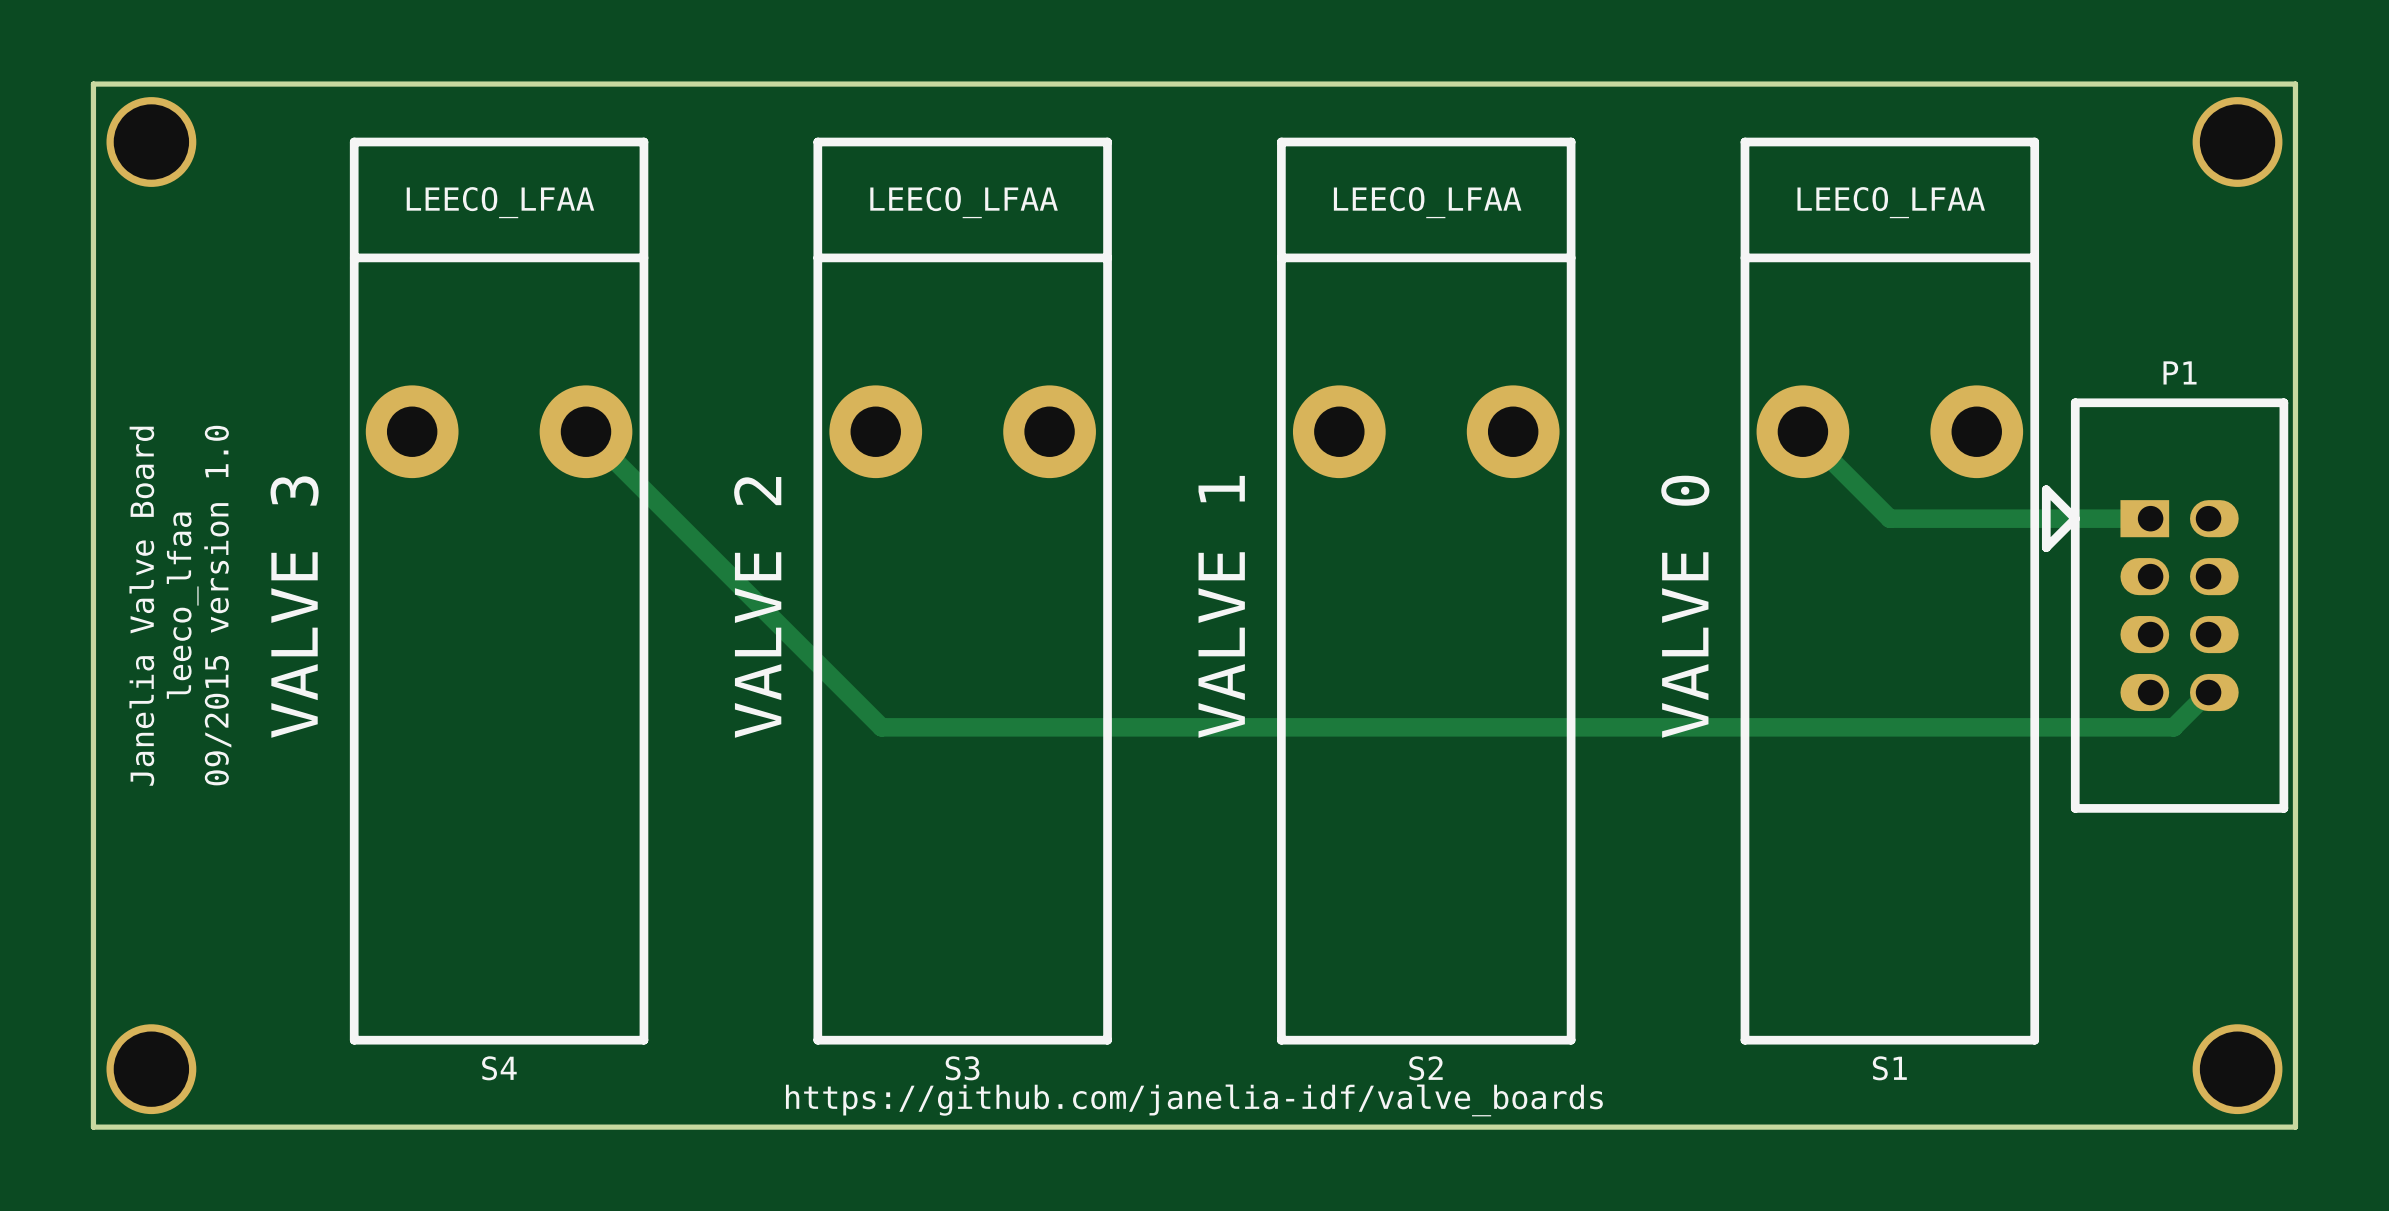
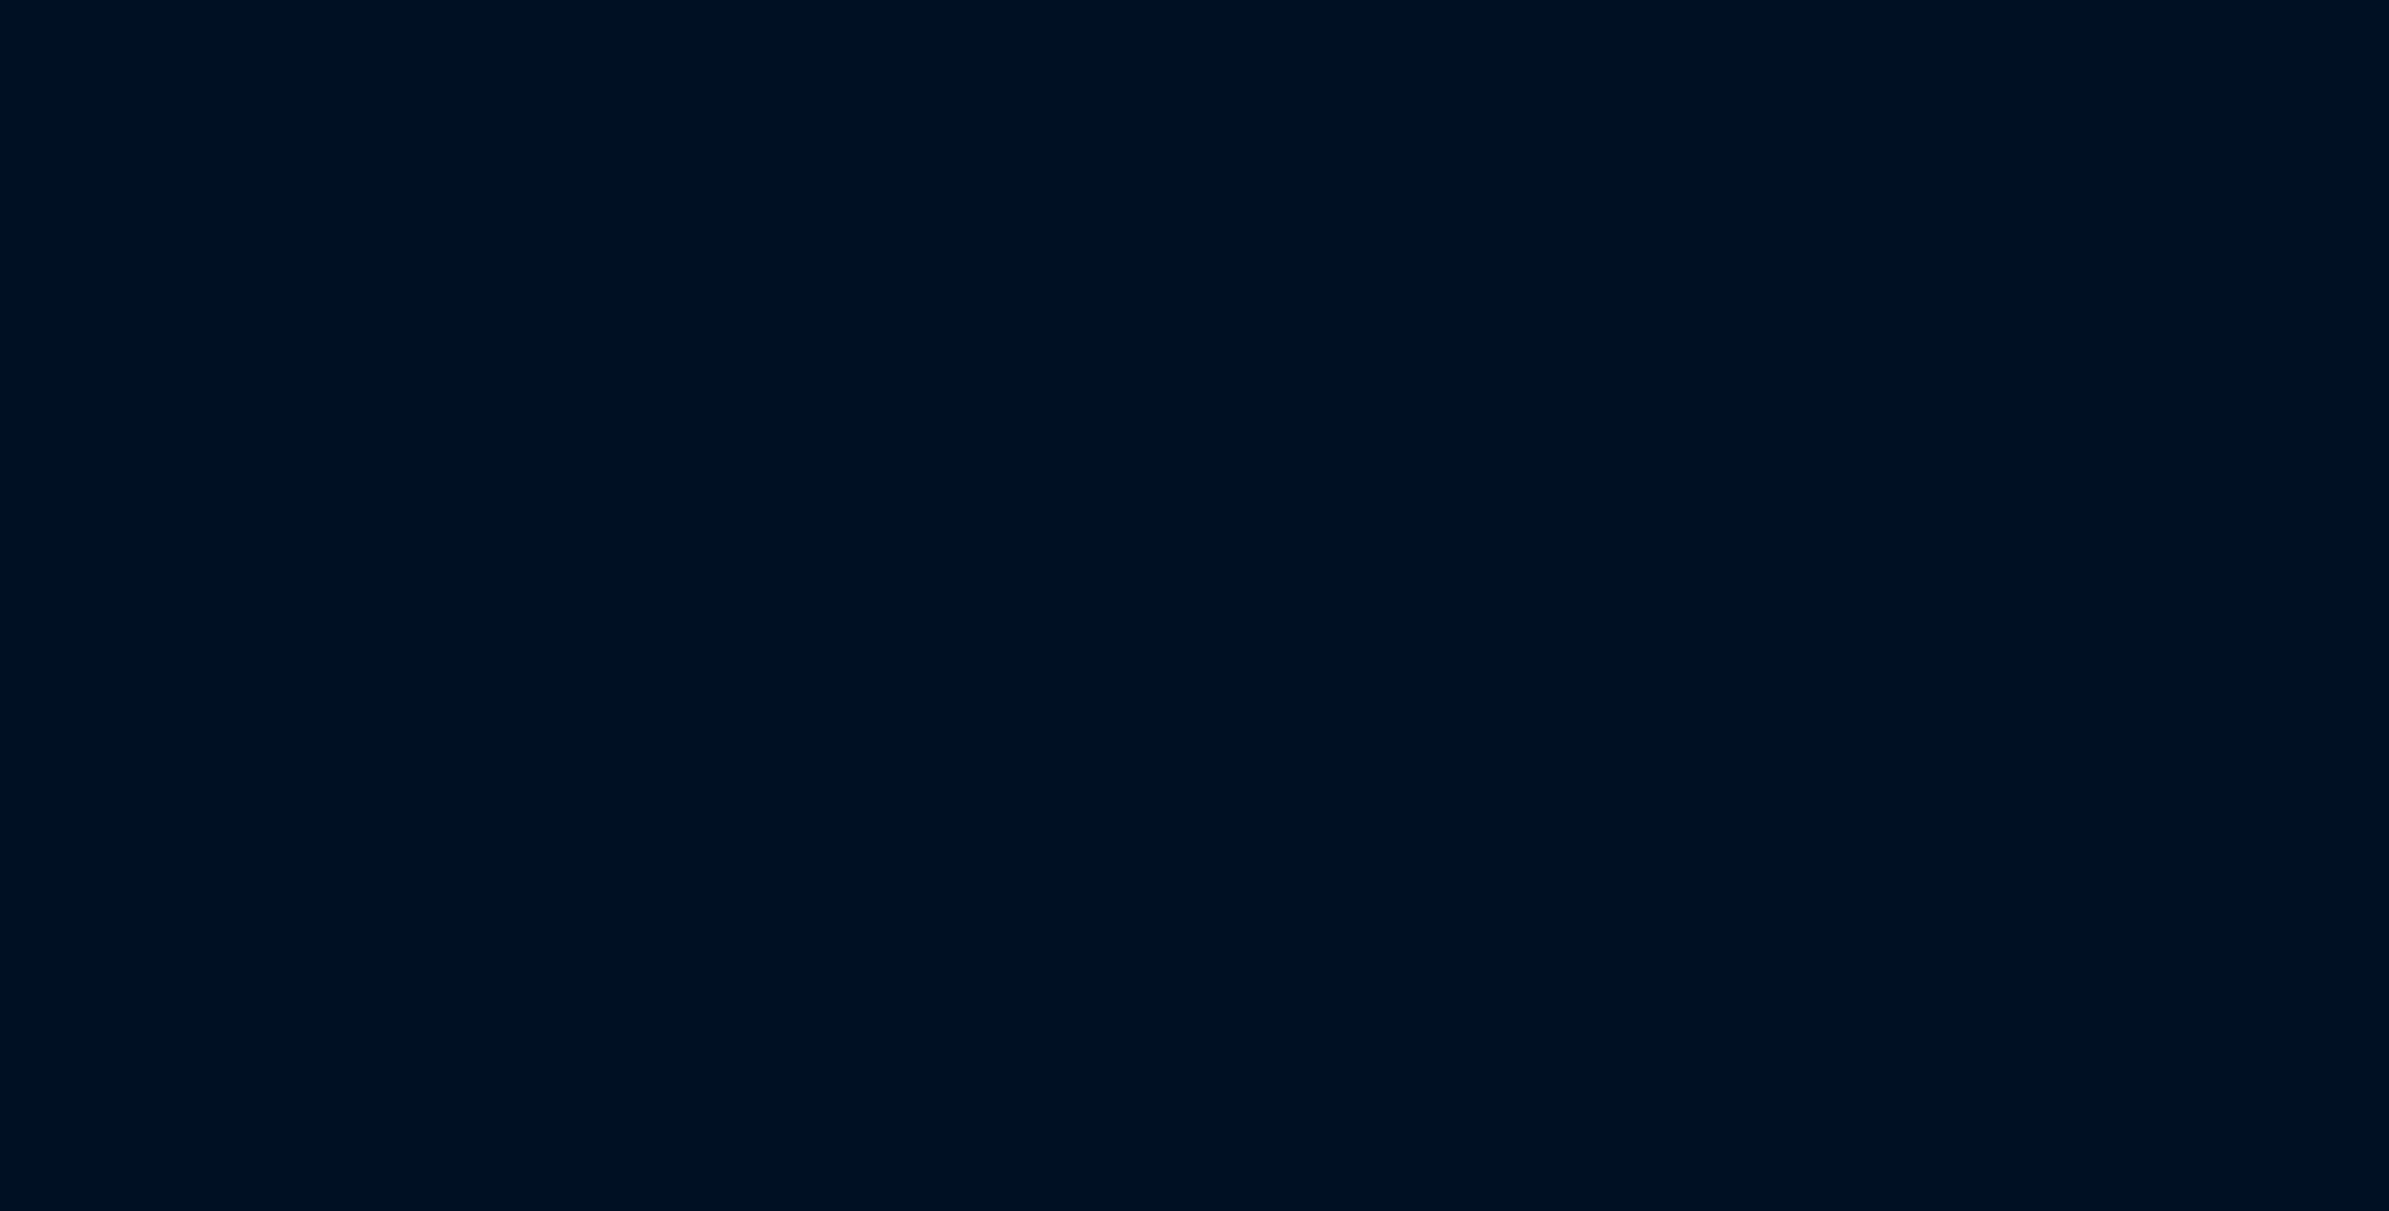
board edge: (93, 84) (2295, 84) (2295, 1127) (93, 1127) (93, 84) -> none
part: (151, 142) -> none
part: (2237, 142) -> none
track: (586, 431) (881, 727) (2173, 727) (2208, 692) -> none
track: (1802, 431) (1889, 518) (2150, 518) -> none
S4: LEECO_LFAA (499, 591) -> none
S3: LEECO_LFAA (962, 591) -> none
S2: LEECO_LFAA (1426, 591) -> none
S1: LEECO_LFAA (1889, 591) -> none
text: leeco_lfaa (182, 605) -> none
text: 09/2015 version 1.0 (217, 605) -> none
P1: (2165, 605) -> none
text: Janelia Valve Board (141, 606) -> none
text: VALVE 1 (1221, 606) -> none
text: VALVE 0 (1685, 606) -> none
text: VALVE 3 (294, 607) -> none
text: VALVE 2 (757, 607) -> none
part: (151, 1069) -> none
part: (2237, 1069) -> none
text: https://github.com/janelia-idf/valve_boards (1194, 1100) -> none

